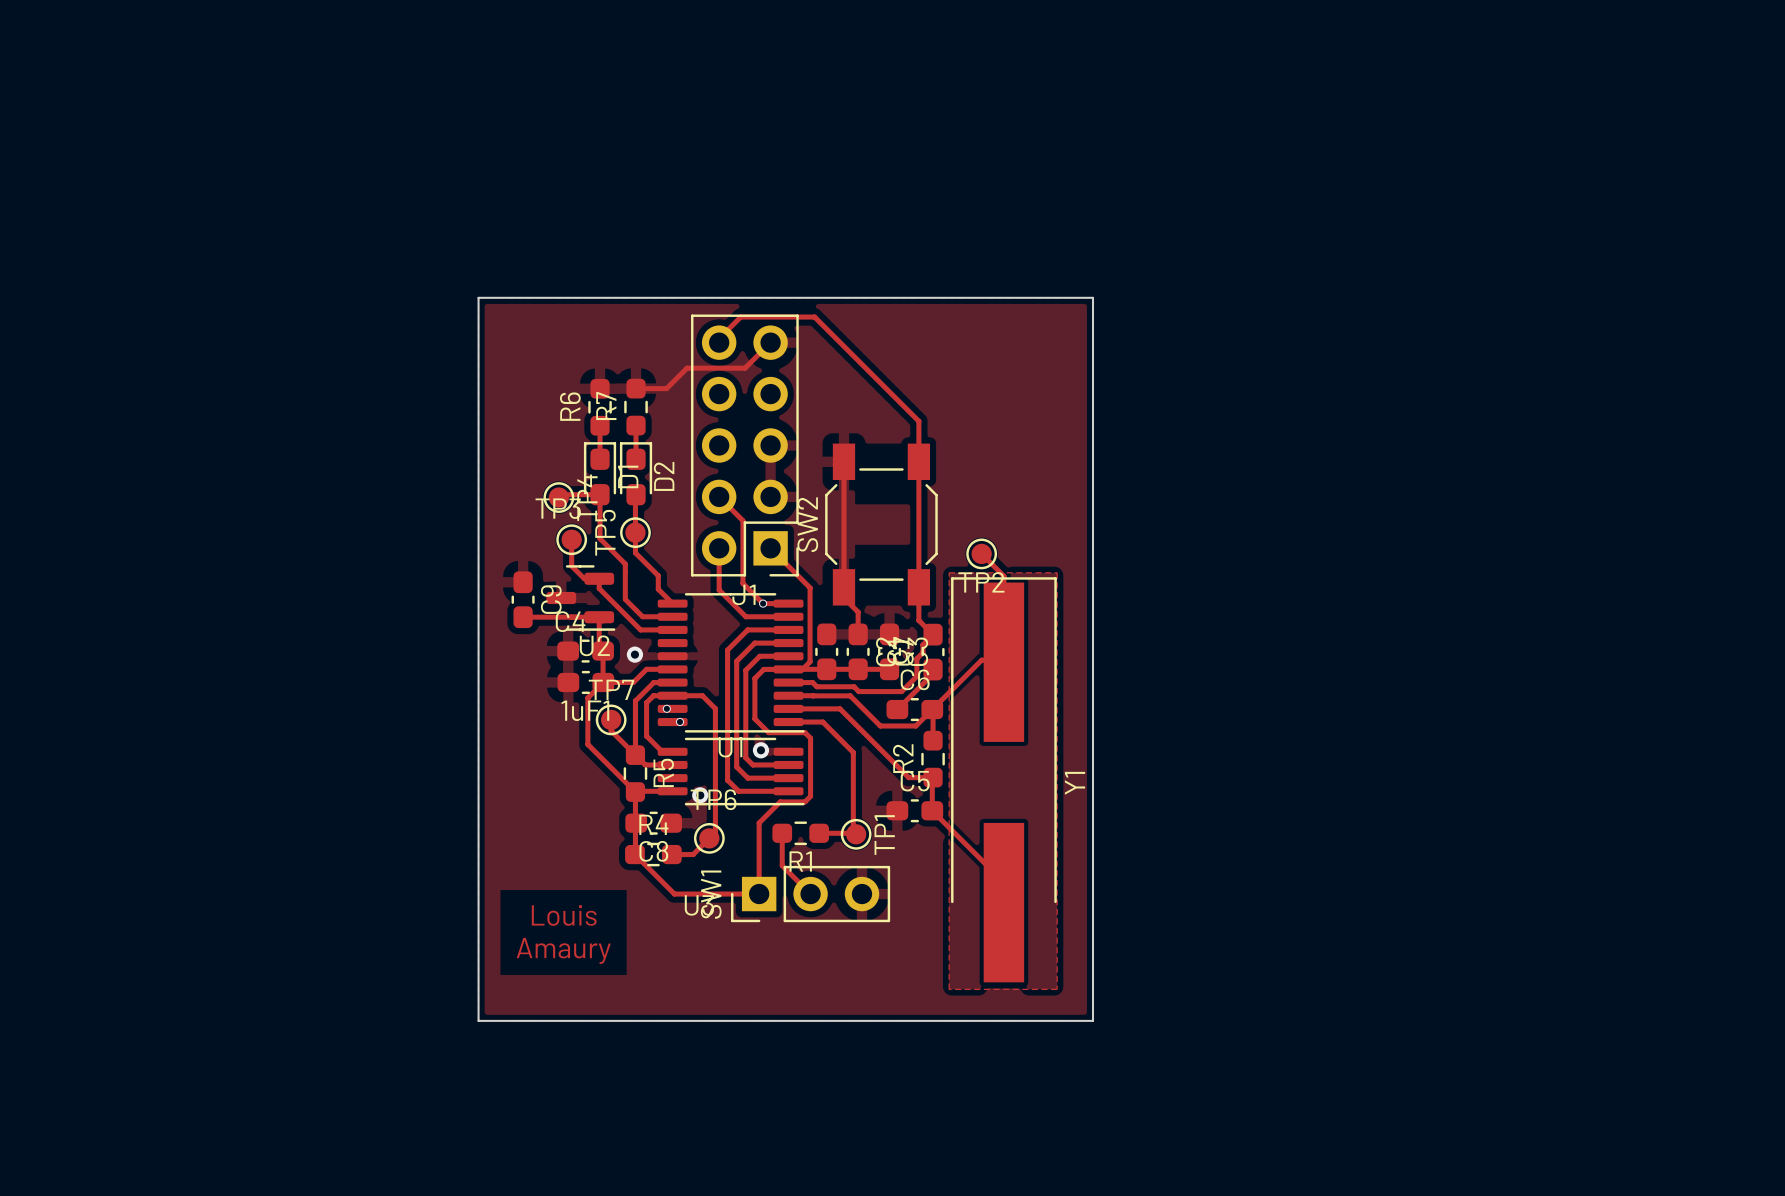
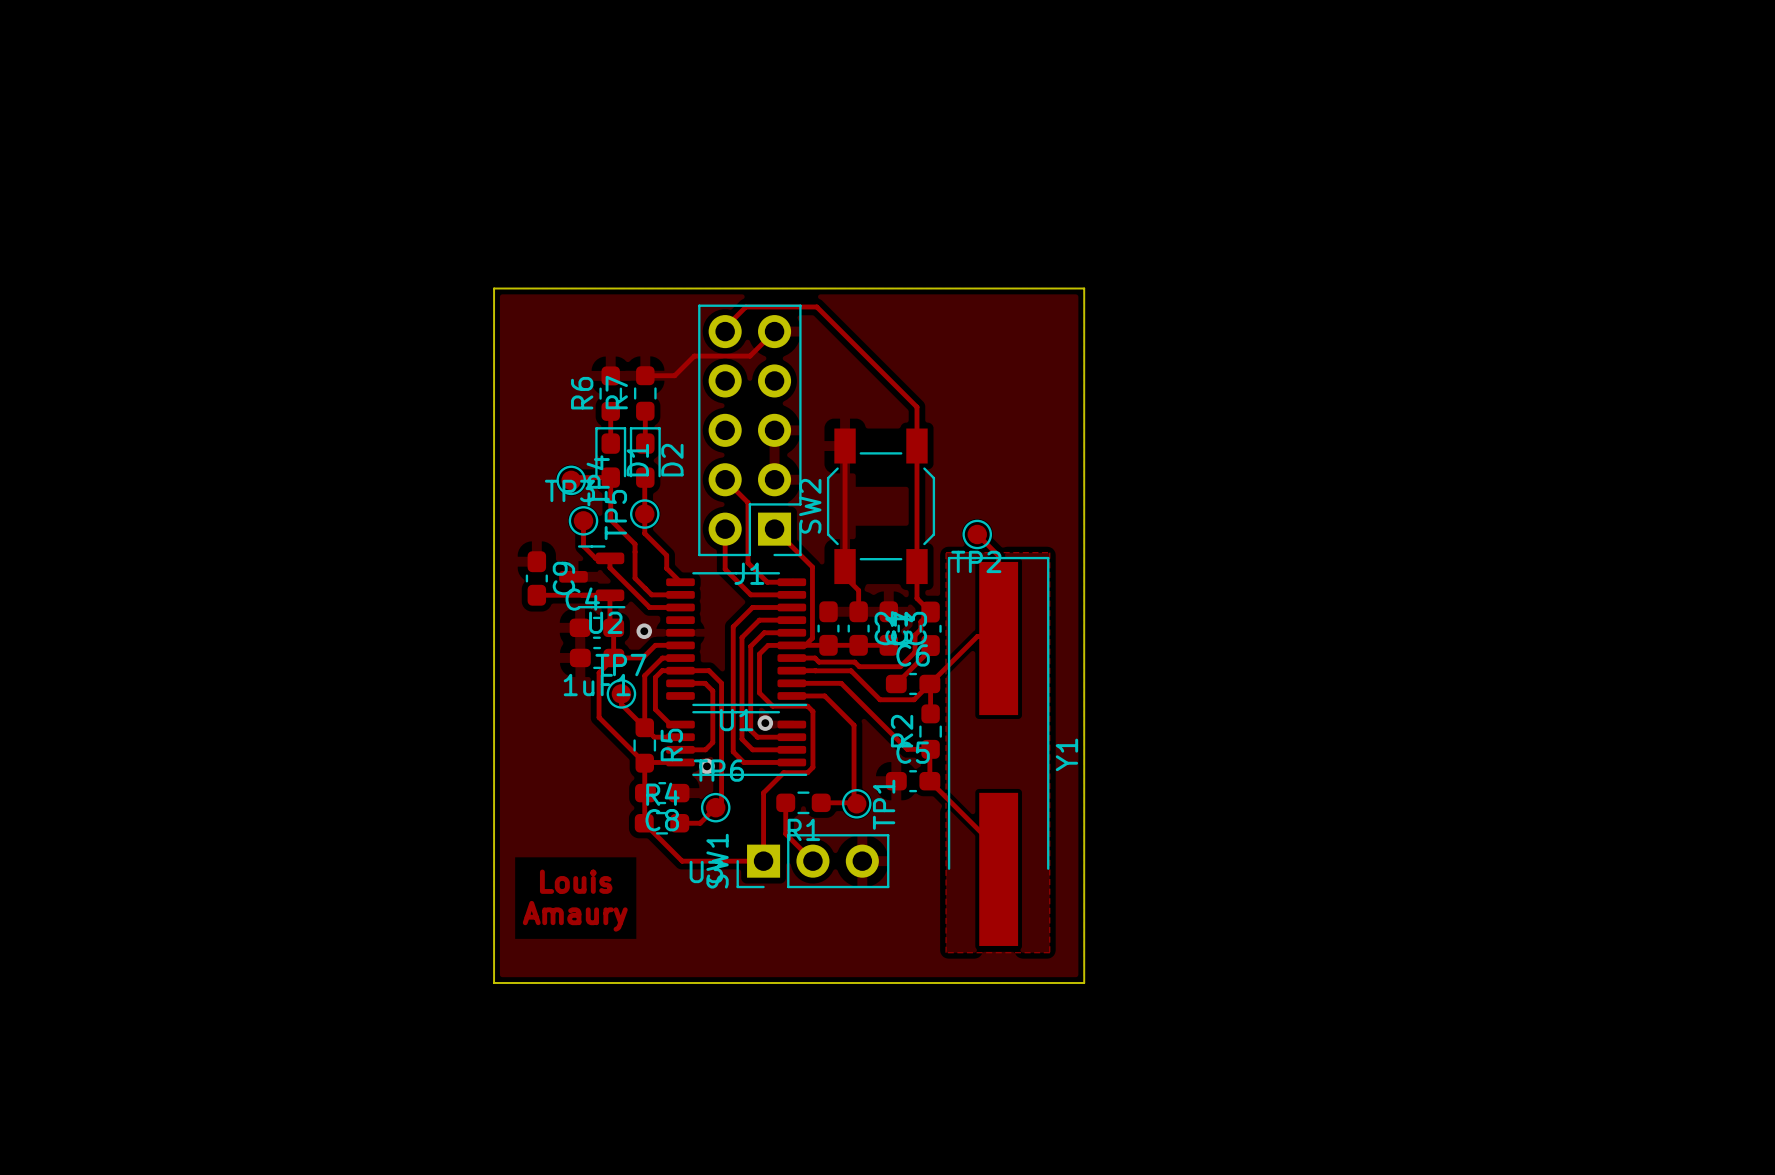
via: (763, 603) -> none
via: (666, 708) -> none
track: none -> (680, 683) (705, 683) (712, 691) (712, 742) (705, 749) (680, 749)
via: (679, 721) -> none

